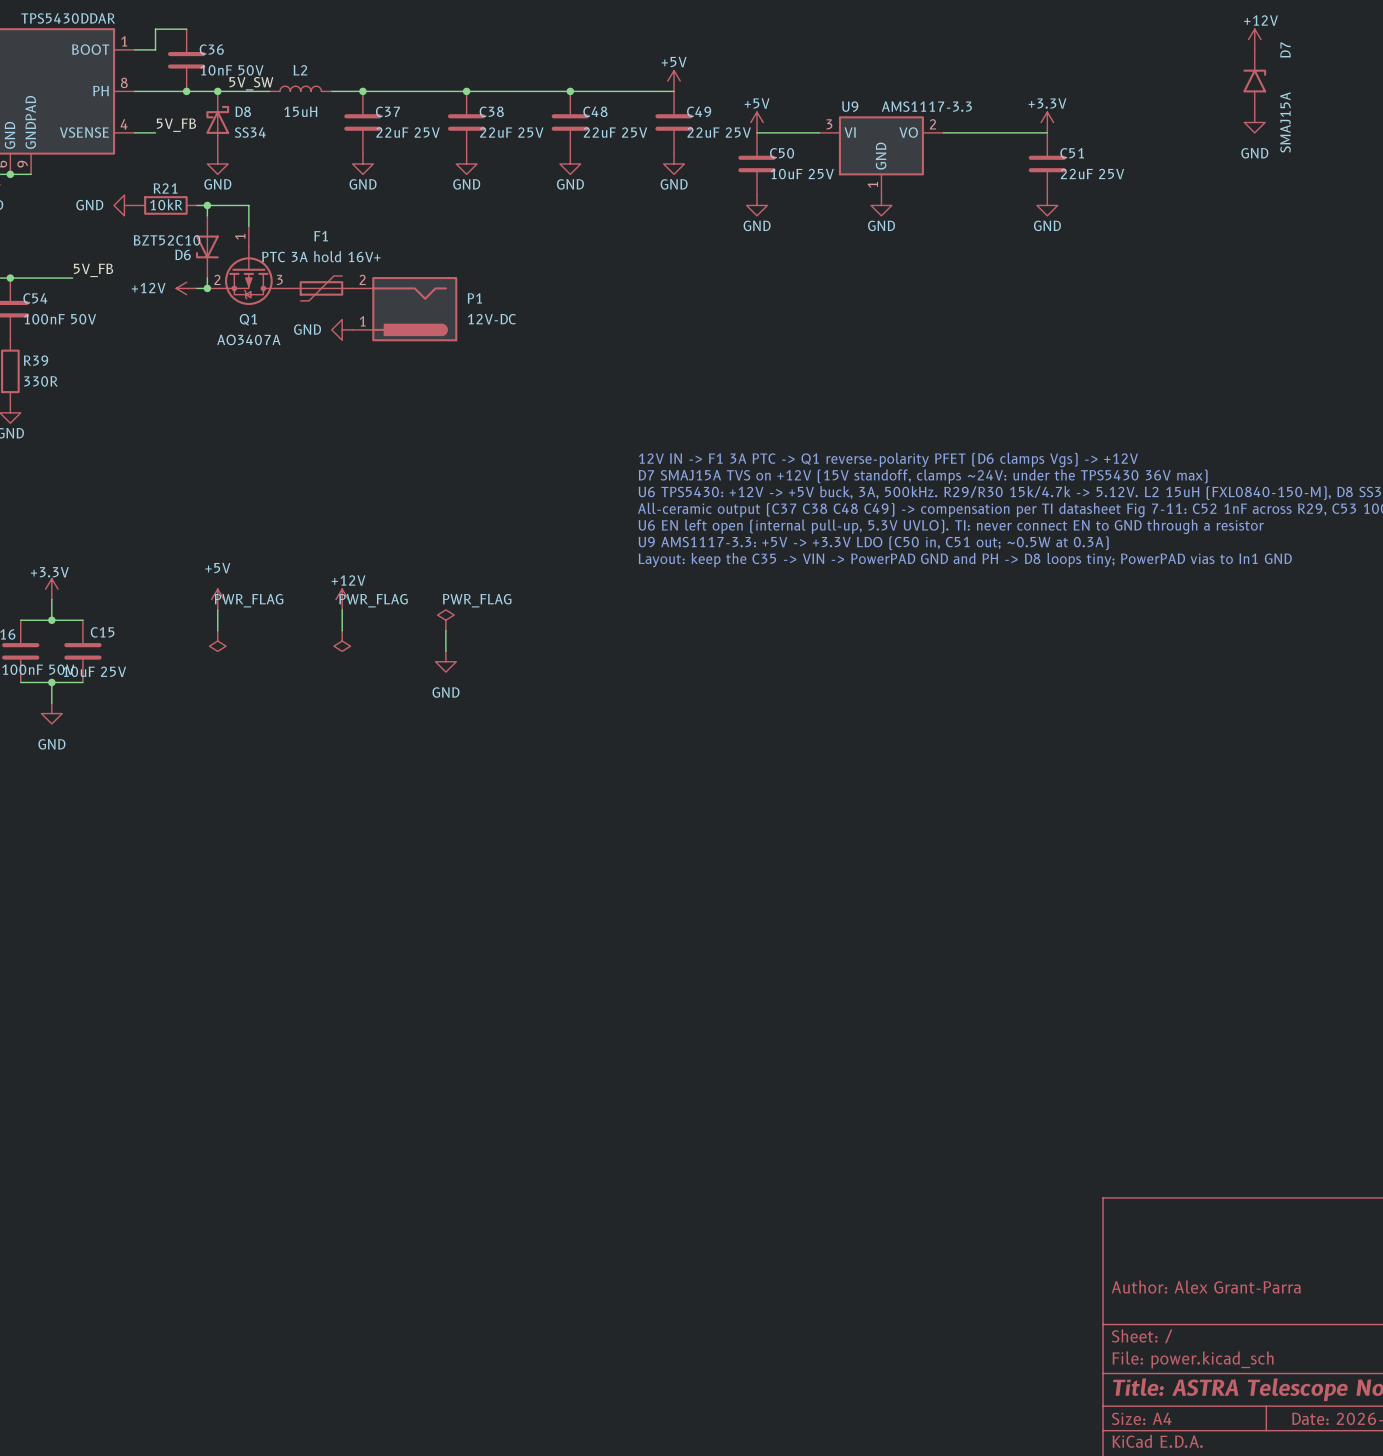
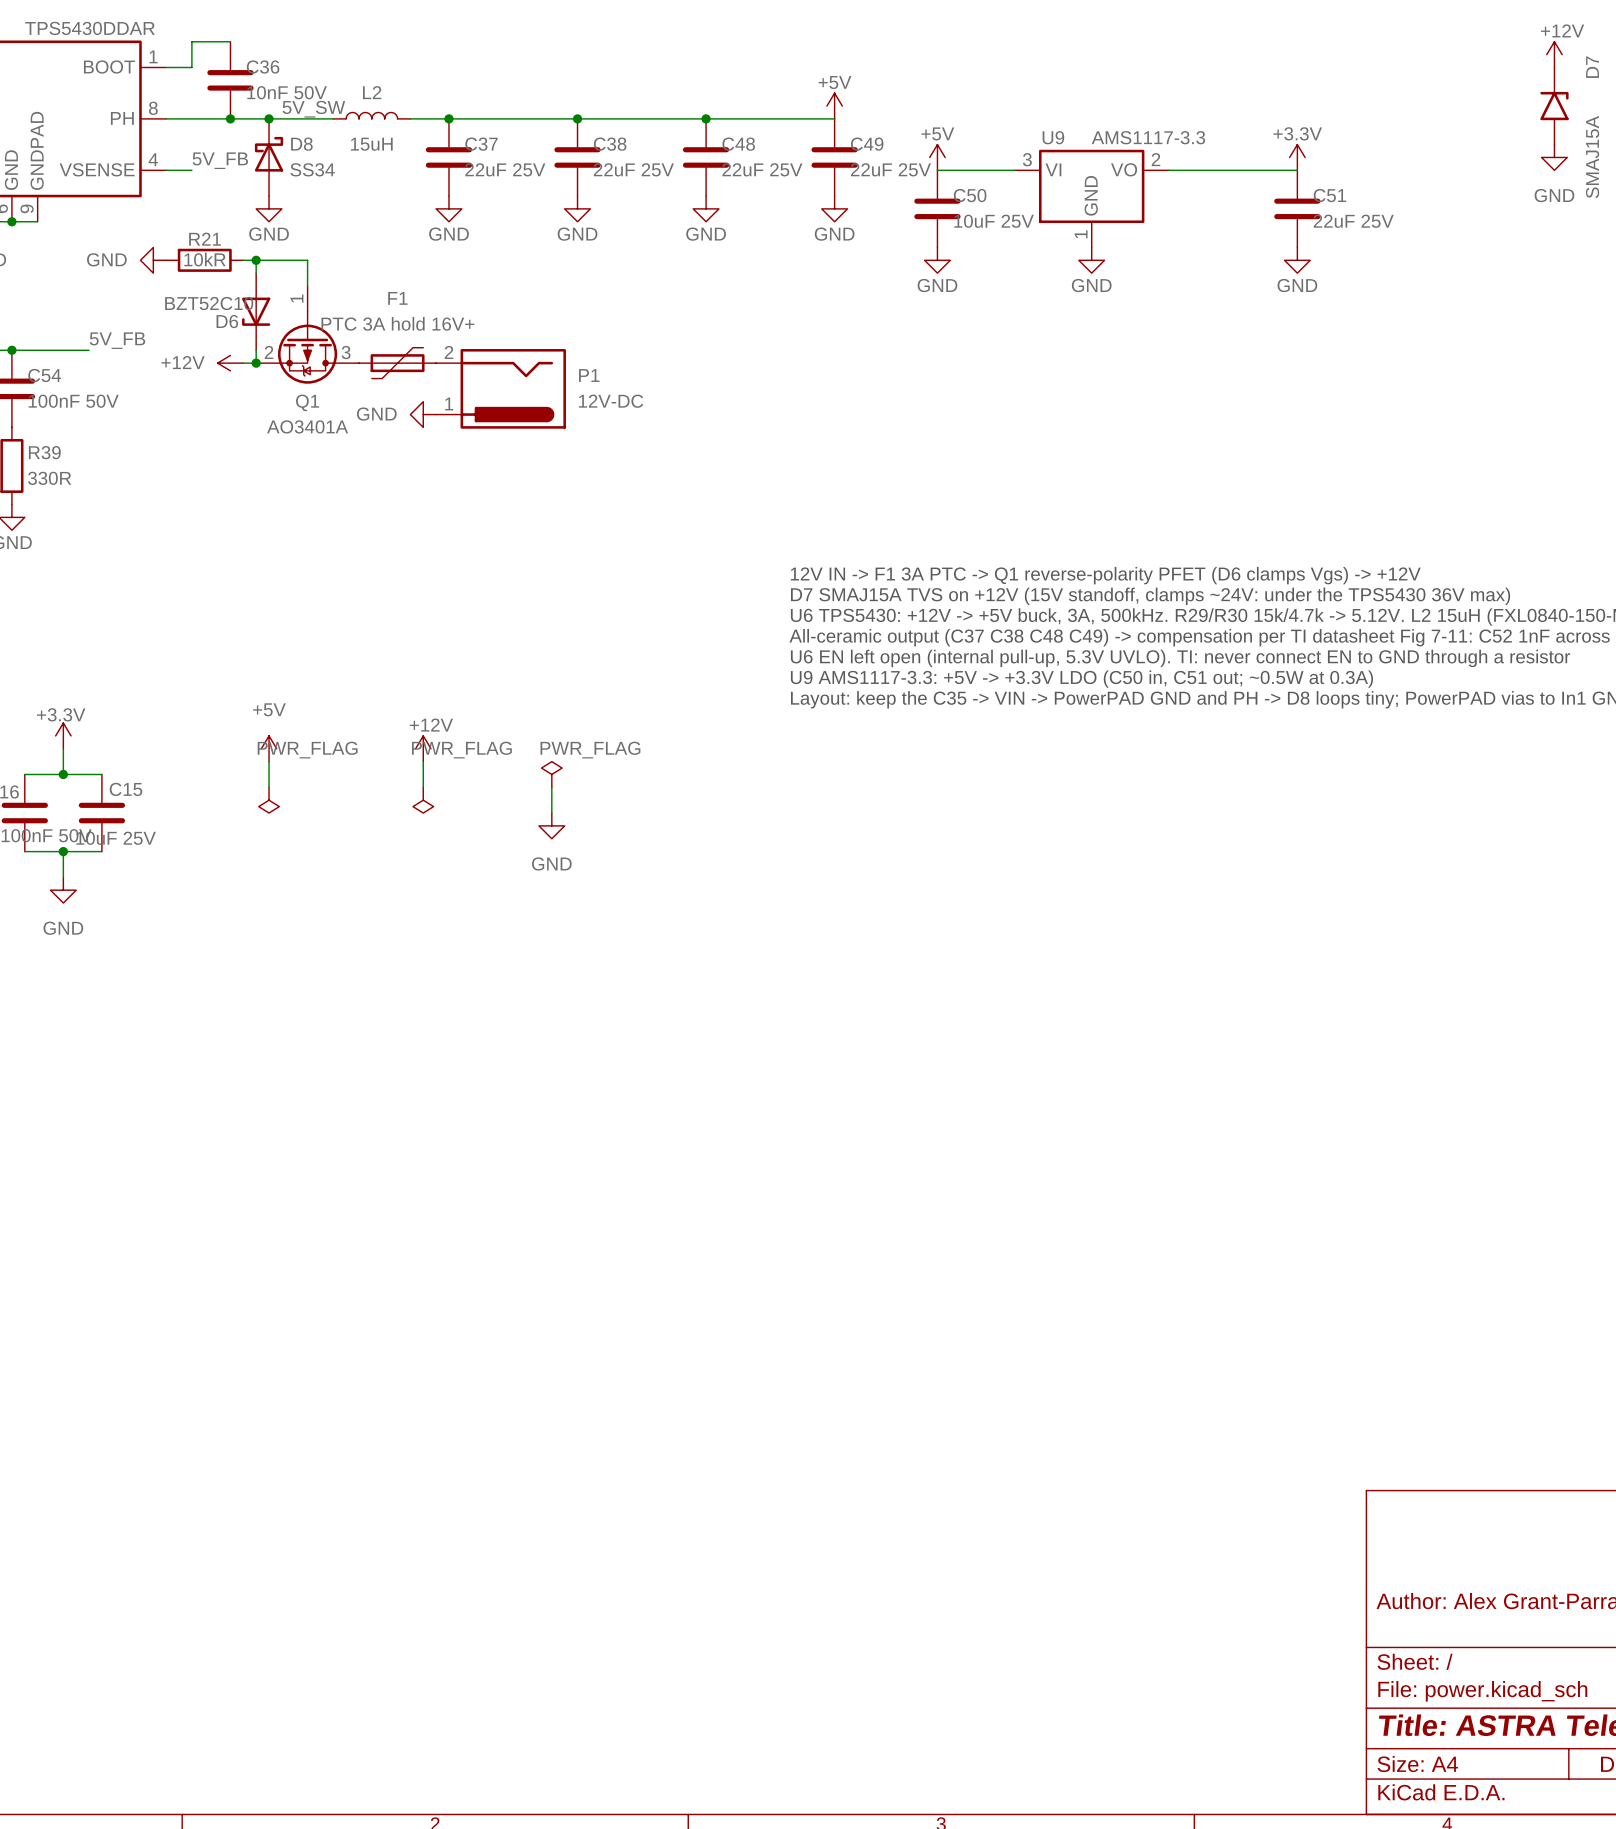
Q1 value: AO3407A (248, 339) -> AO3401A (307, 426)

